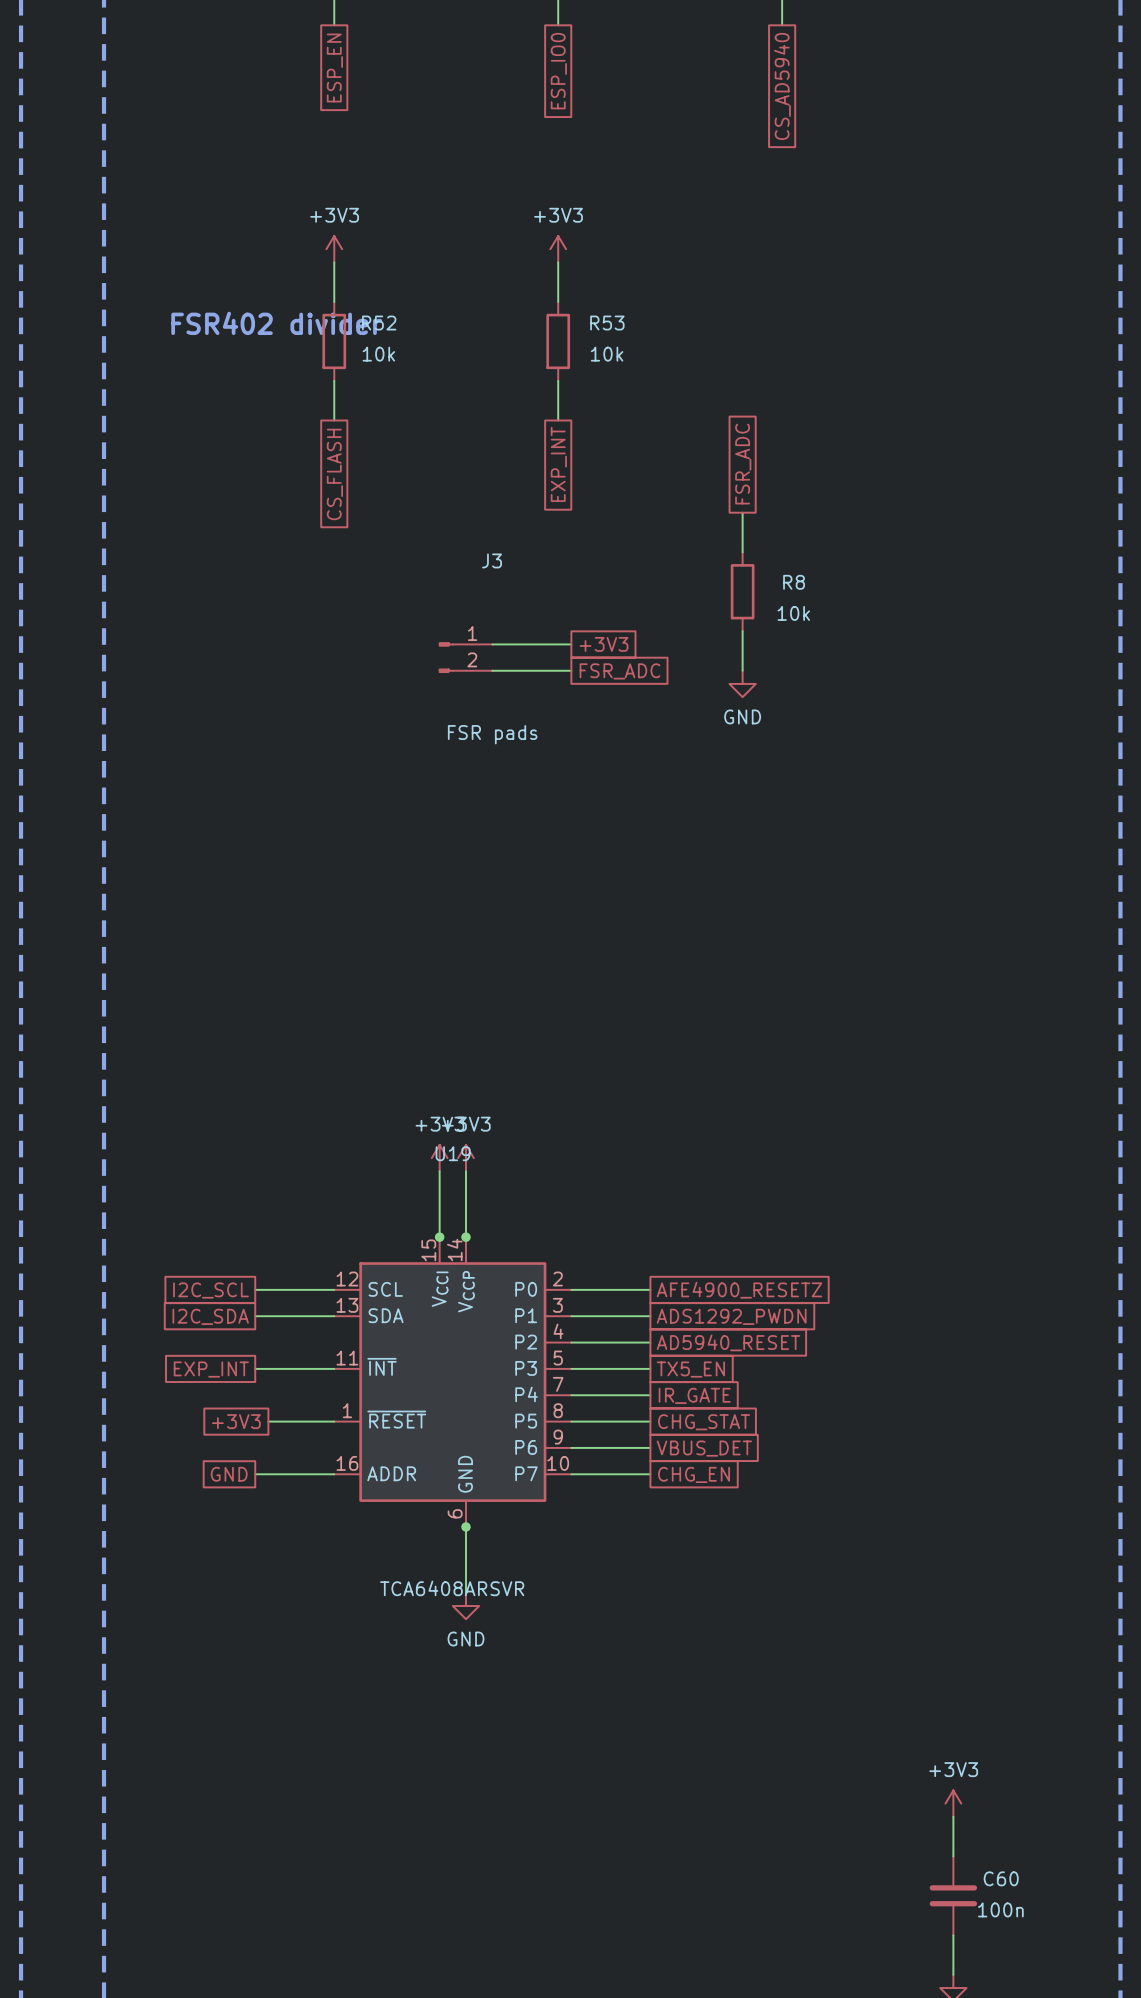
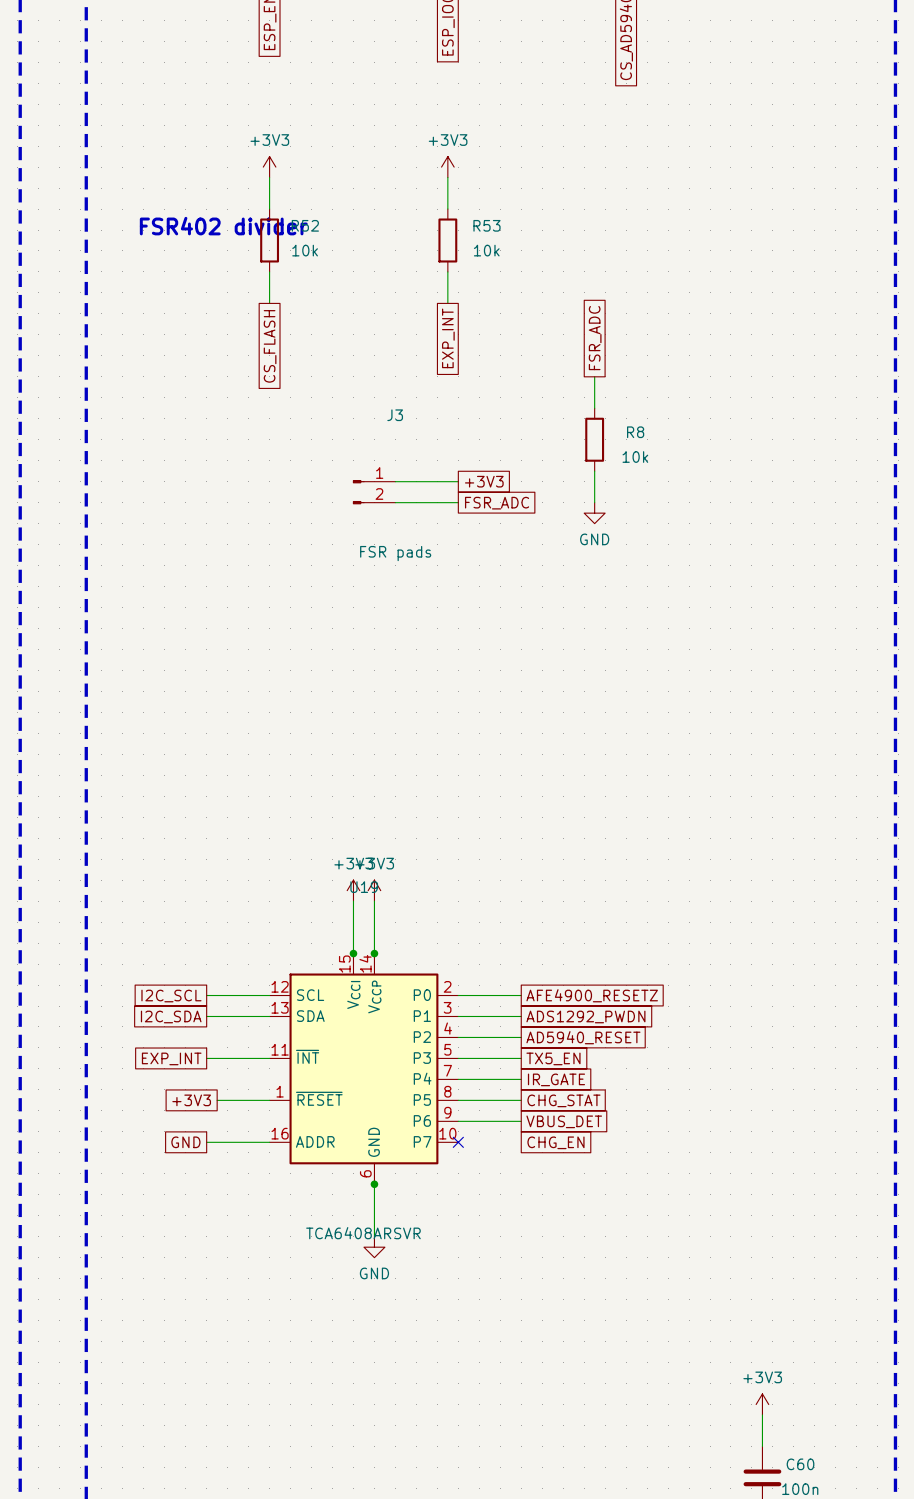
wire: (571, 1474) (650, 1474) -> none
no-connect mark: none -> (458, 1142)

